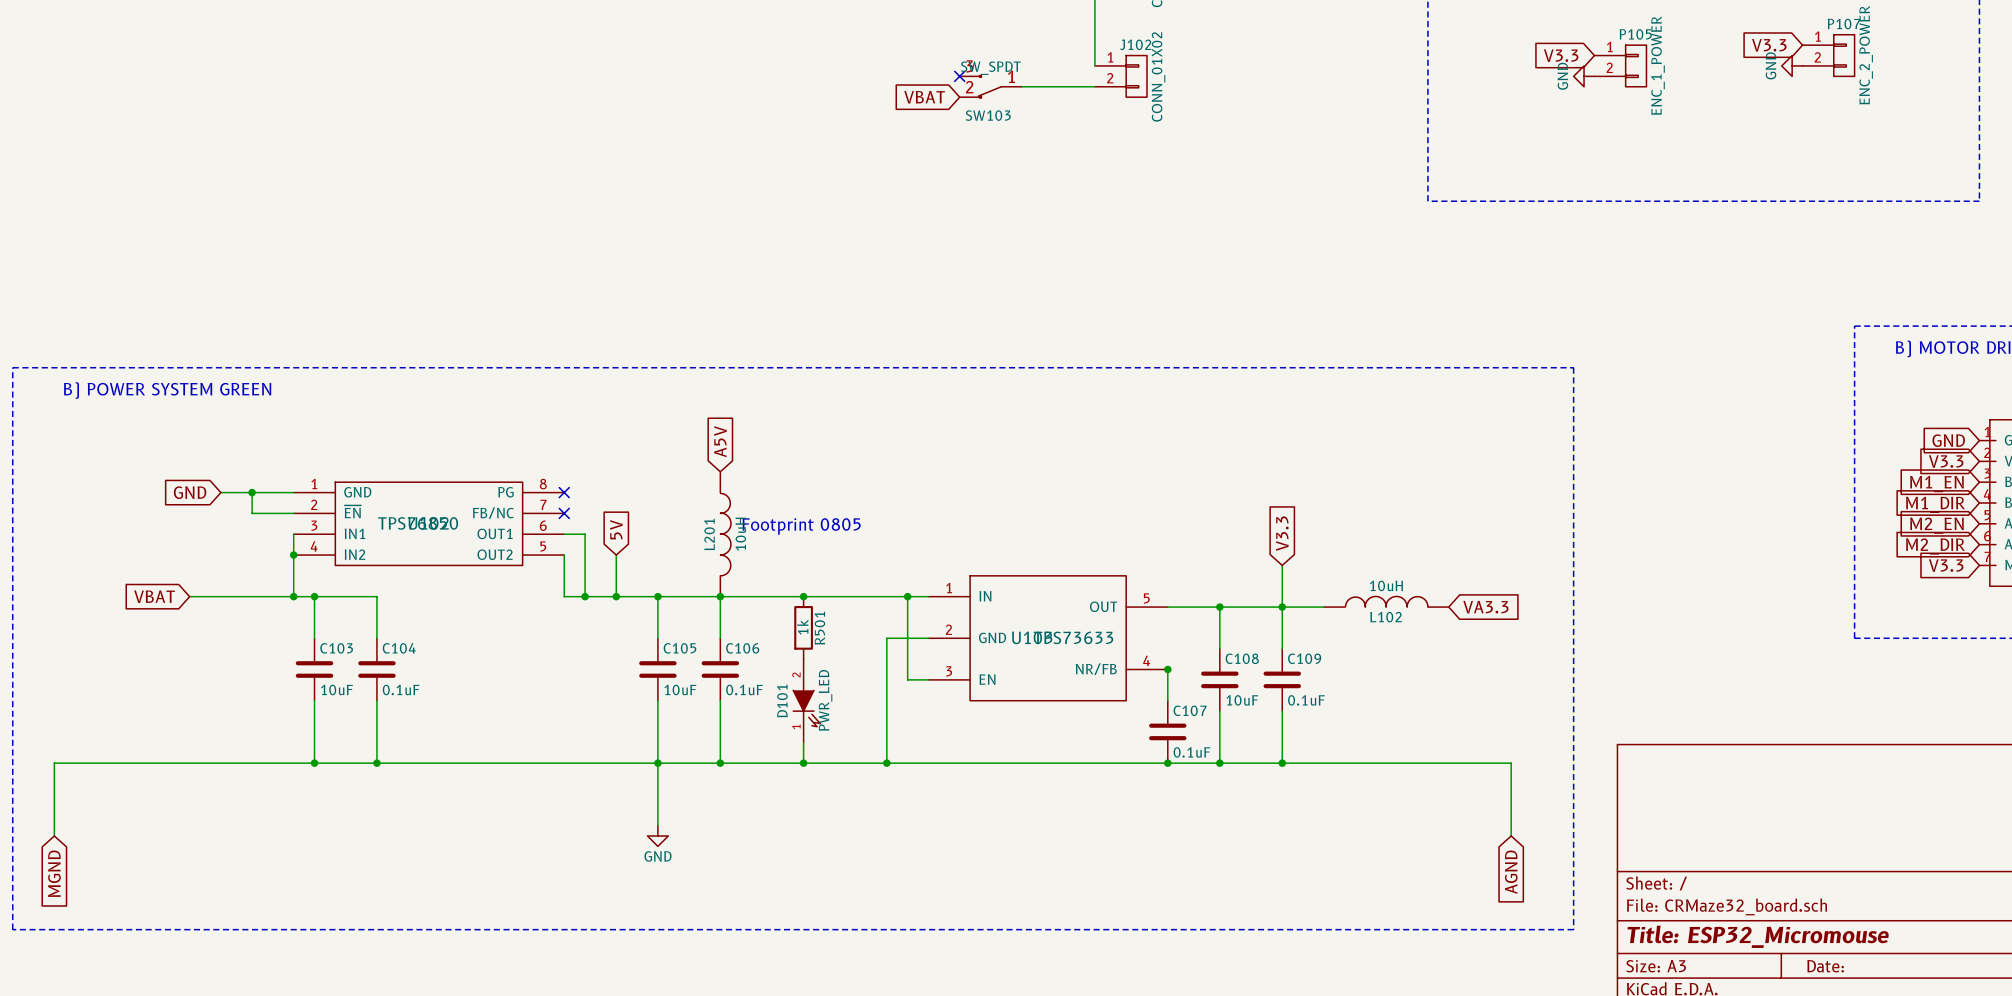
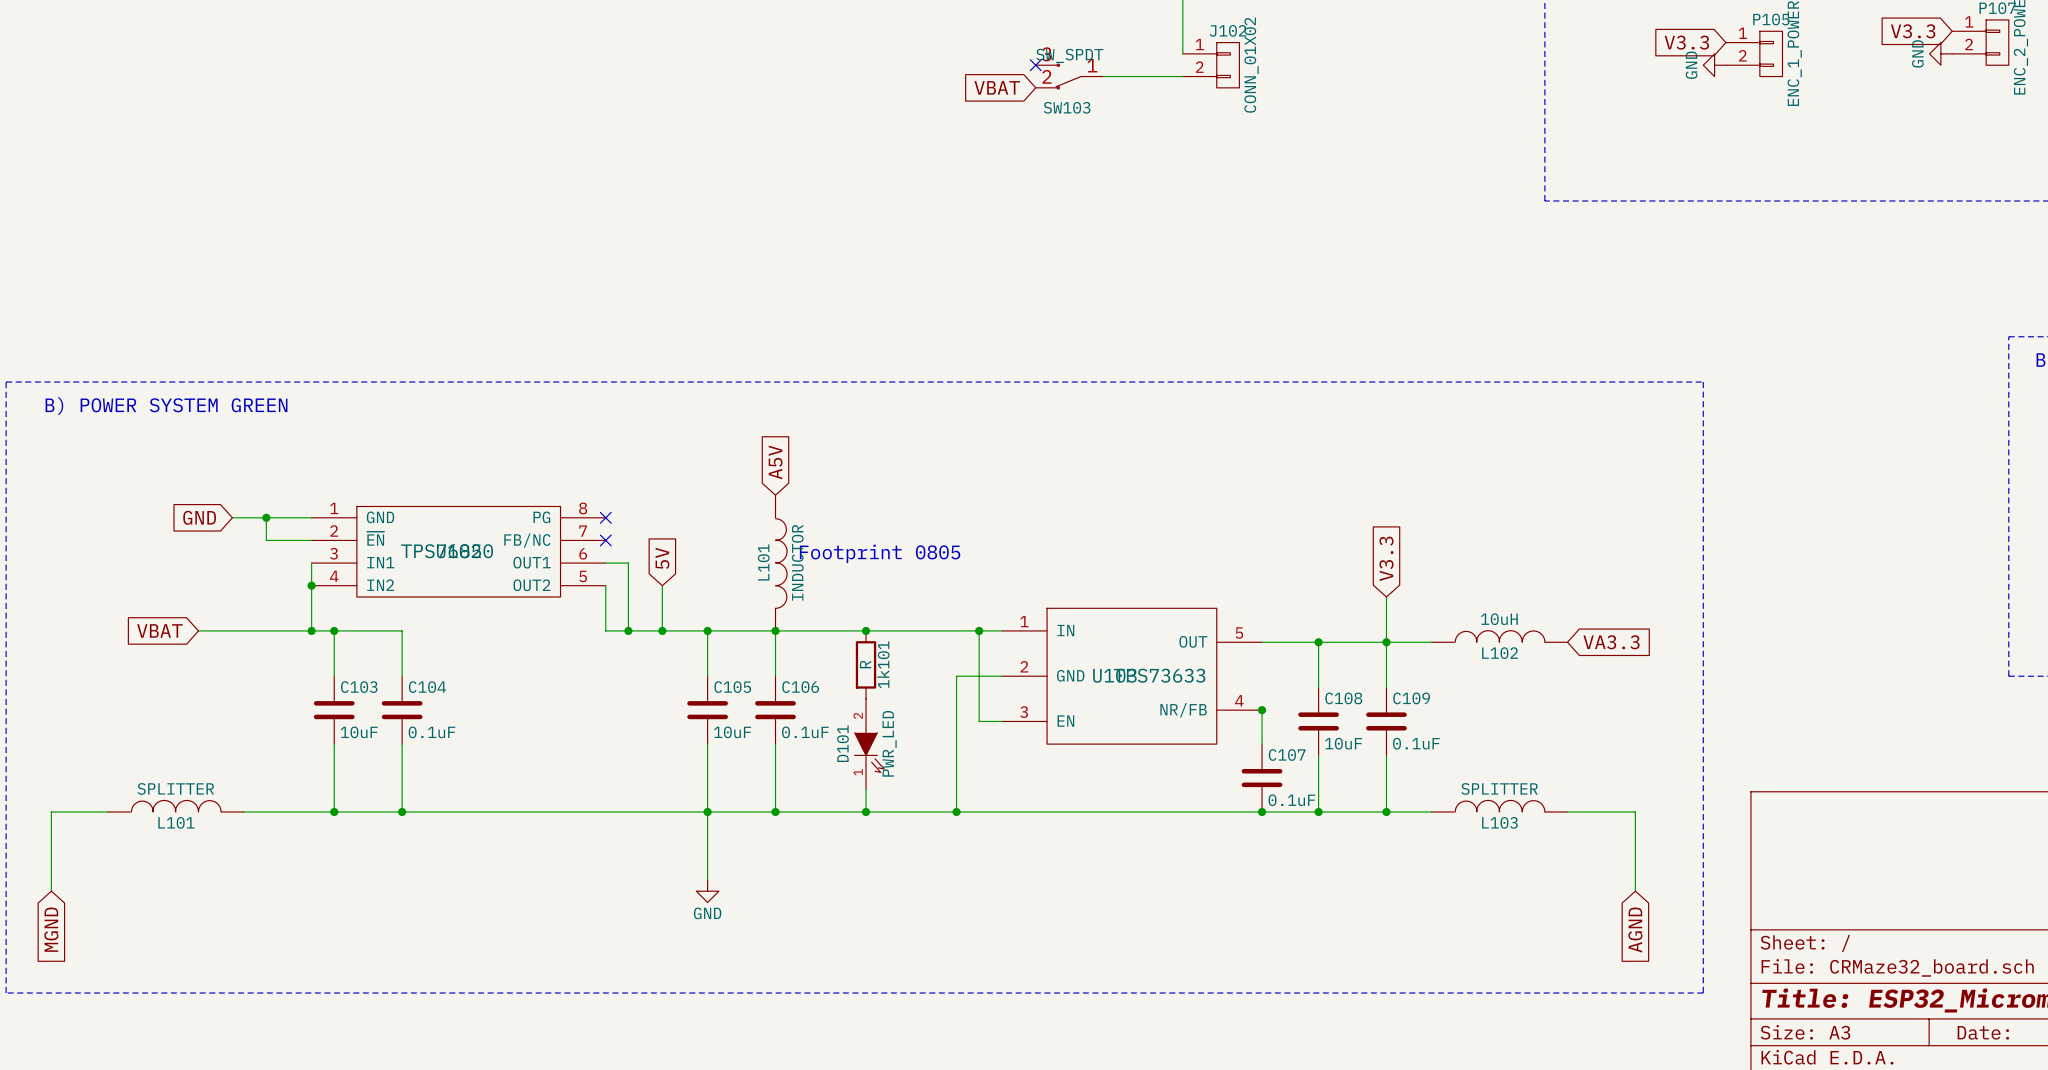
L201 name: L201 (709, 534) -> L101 (763, 562)
L201 value: 10uH (740, 534) -> INDUCTOR (797, 562)
R501 value: 1k (802, 627) -> R (865, 664)
R501 name: R501 (819, 628) -> 1k101 (883, 664)
L101: none -> SPLITTER (175, 806)
L103: none -> SPLITTER (1499, 806)
wire: (106, 763) (231, 763) -> none
wire: (1323, 763) (1448, 763) -> none

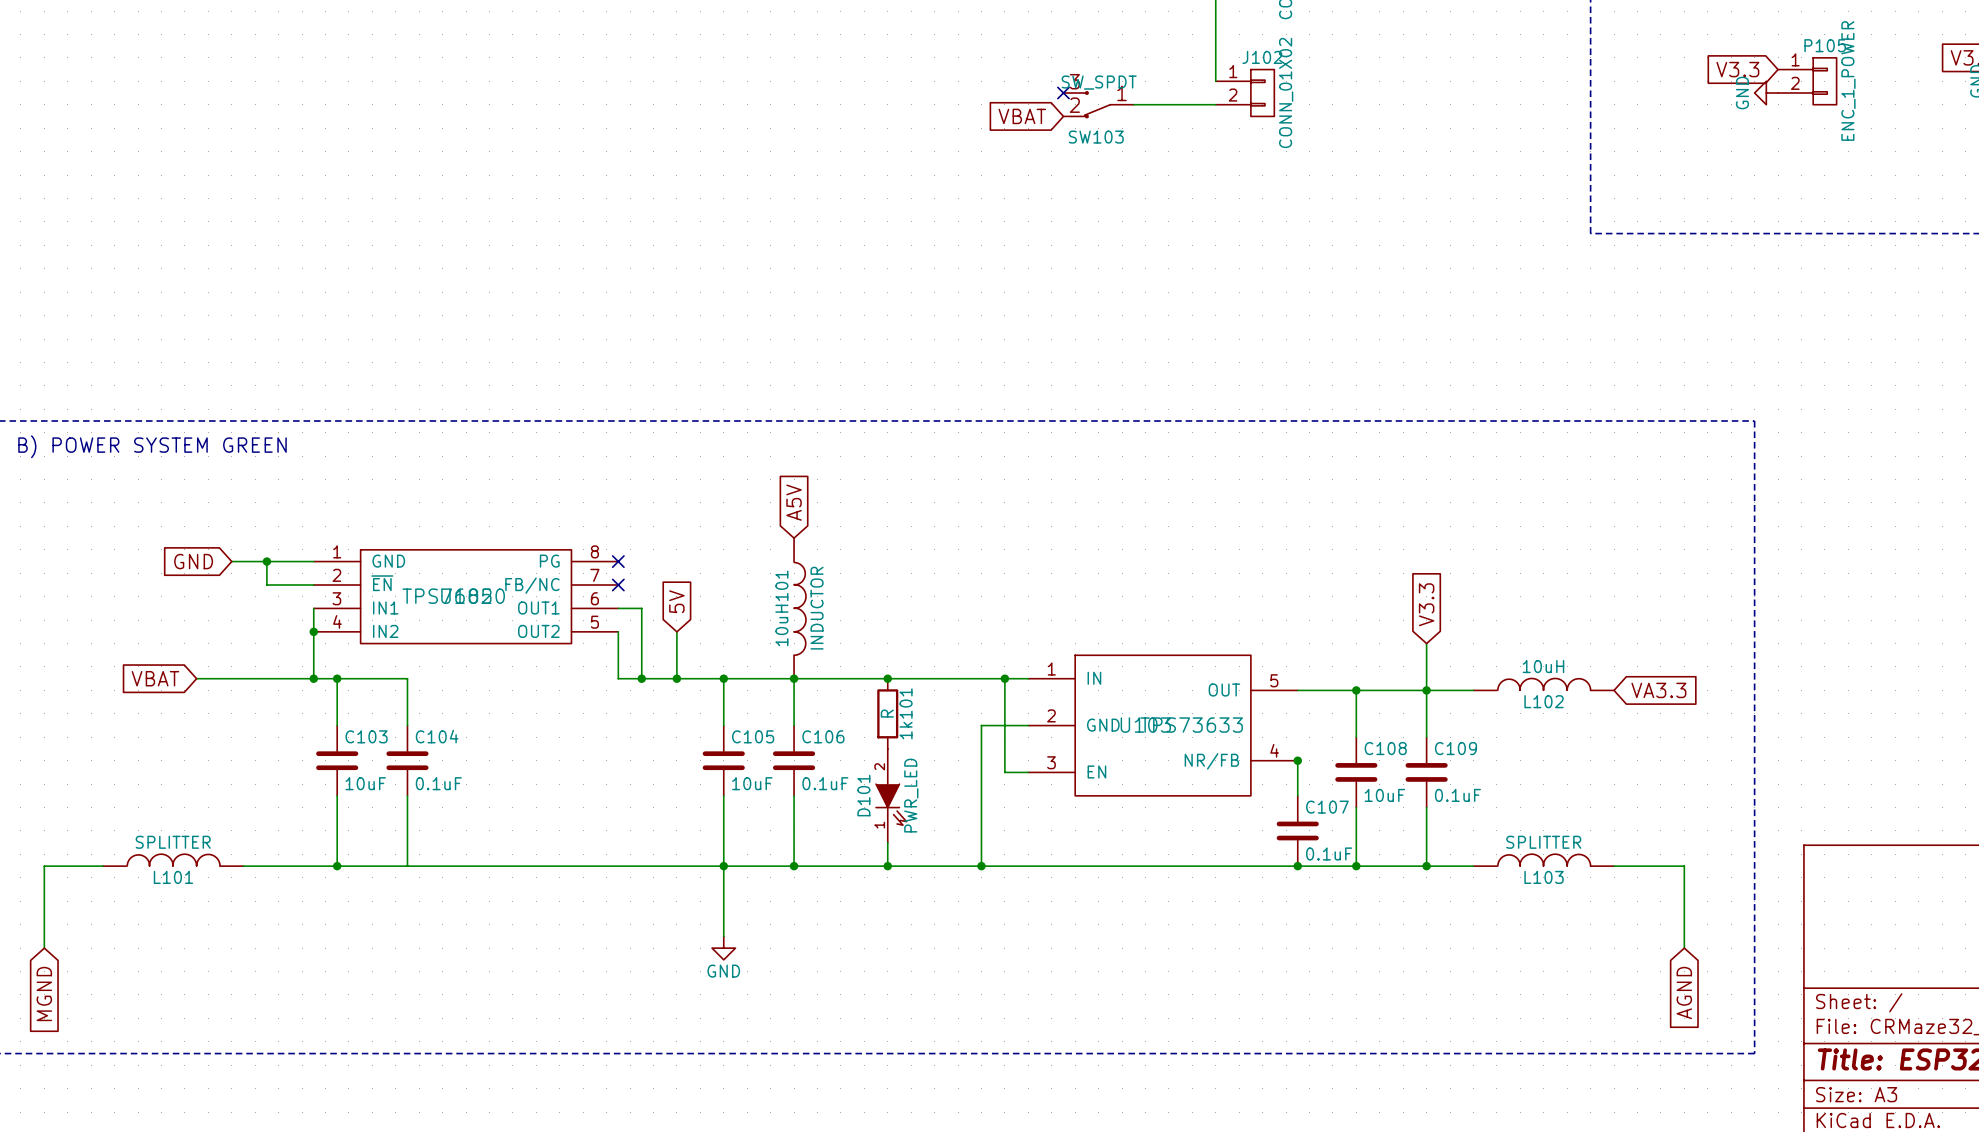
text: Footprint 0805 (880, 553) -> none
L101 name: L101 (763, 562) -> 10uH101 (781, 608)
junction: (402, 811) -> none

